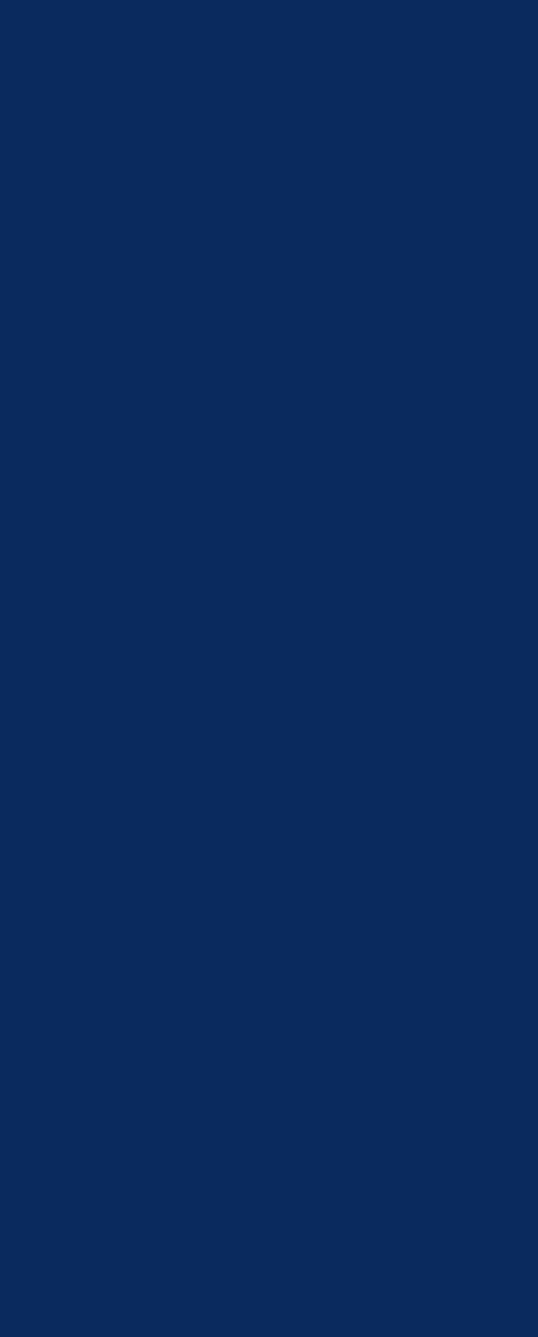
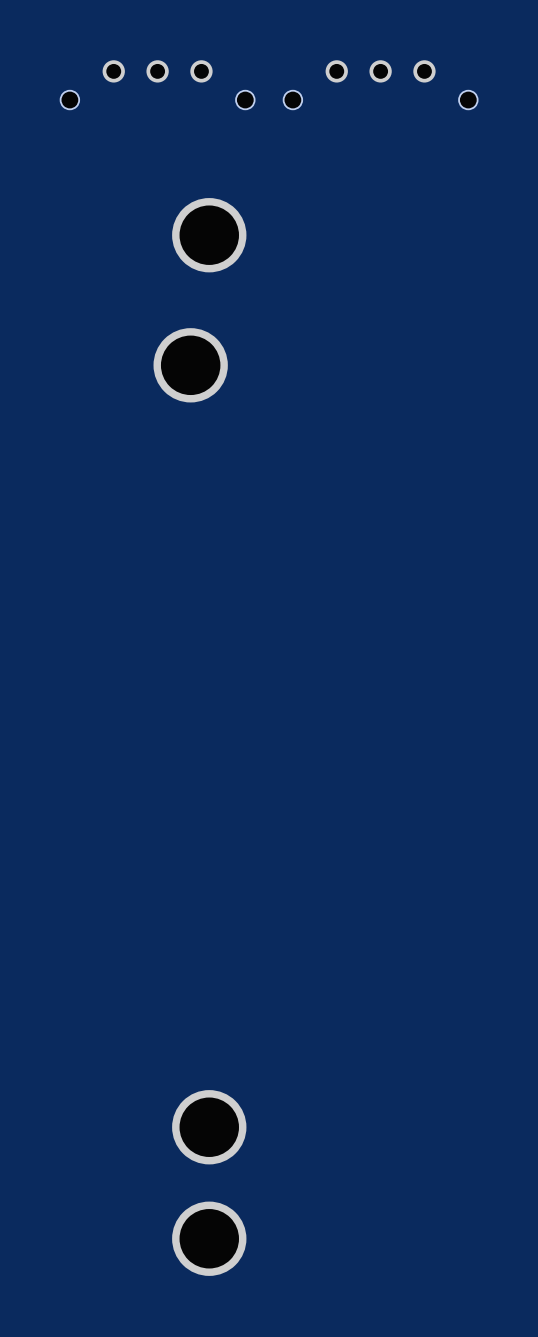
part: none -> (157, 84)
part: none -> (380, 84)
part: none -> (209, 235)
part: none -> (190, 365)
part: none -> (209, 1127)
part: none -> (209, 1238)

